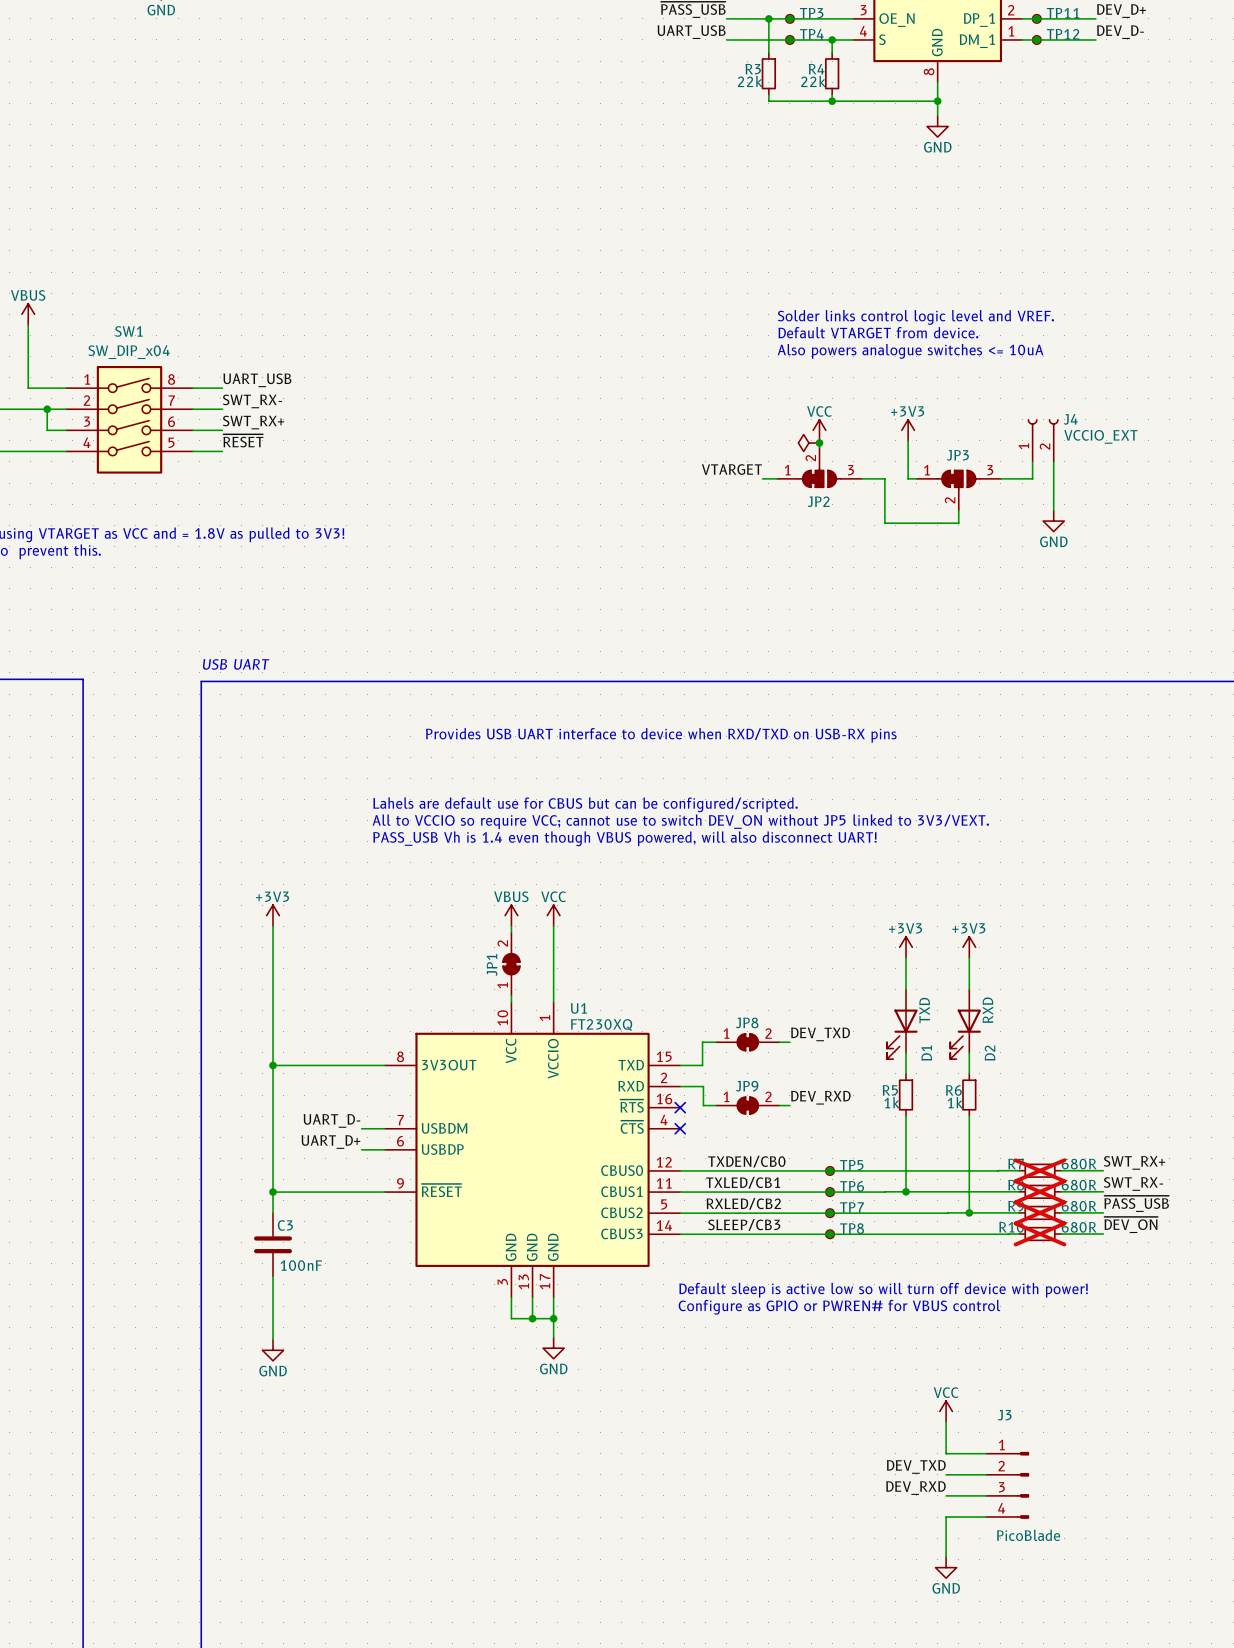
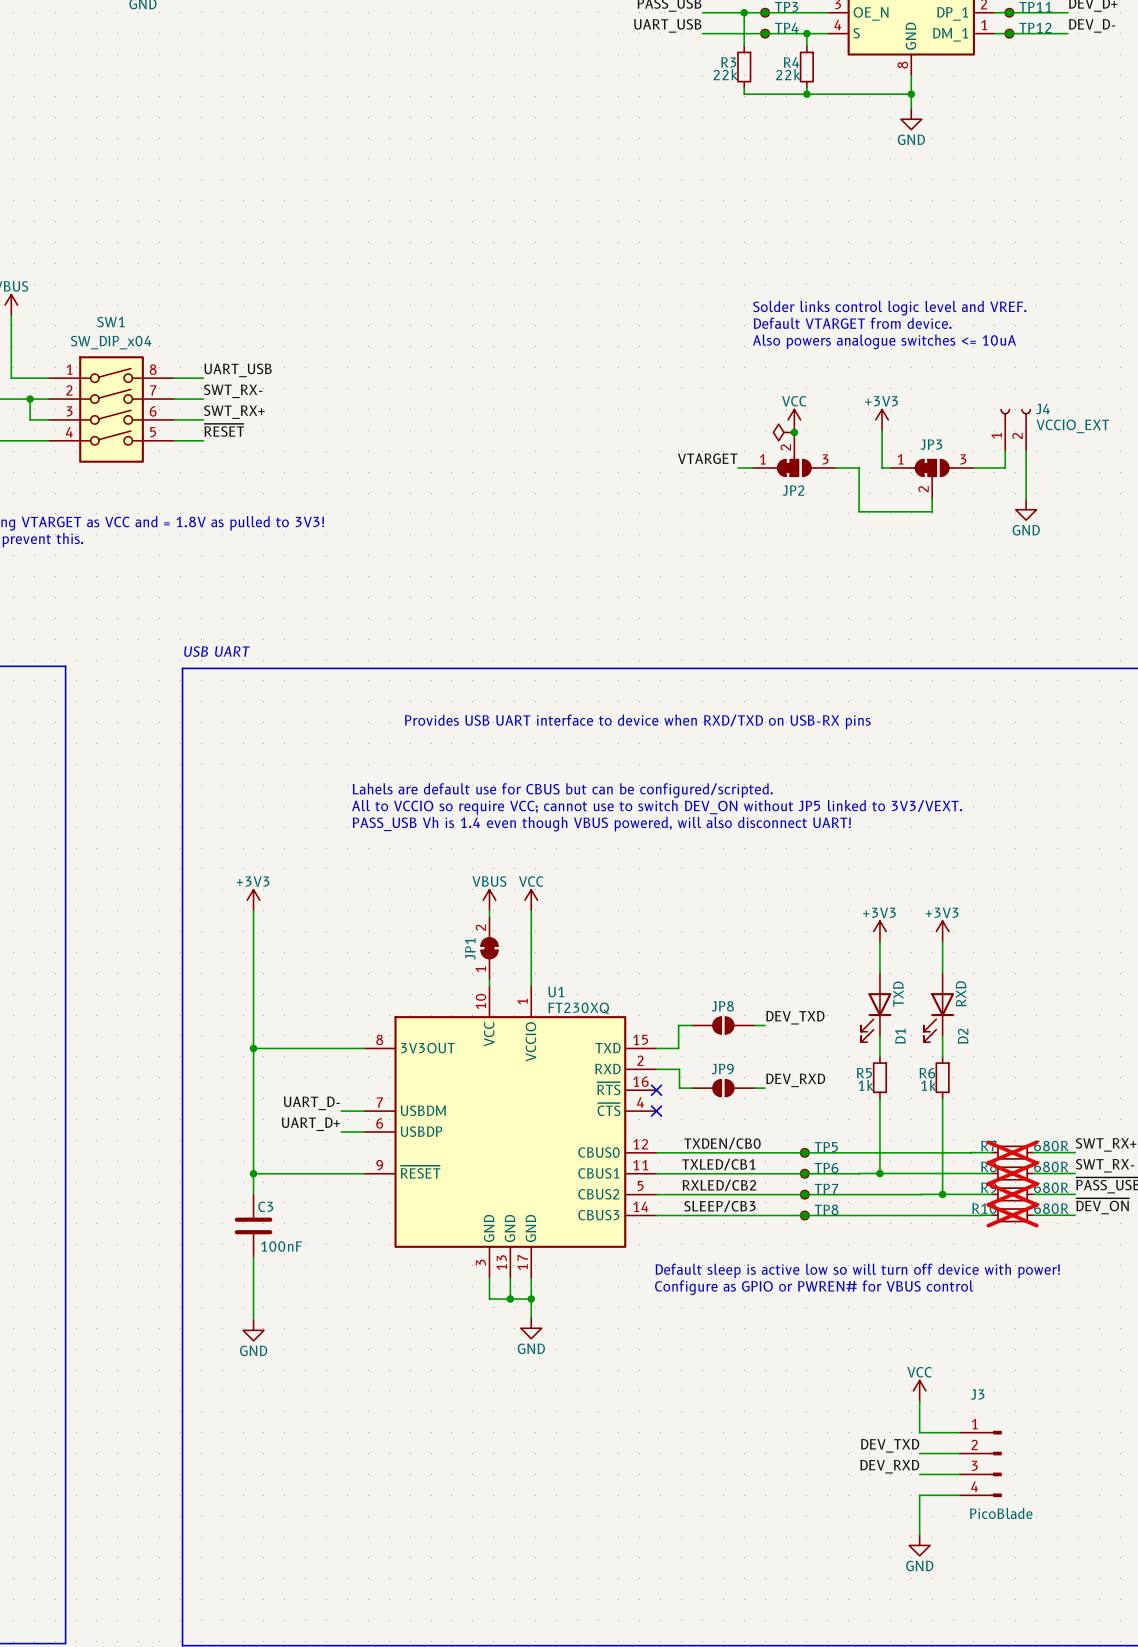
JP8 symbol: [716, 1033, 780, 1051] -> [692, 1017, 755, 1034]
JP9 symbol: [716, 1097, 780, 1114] -> [692, 1079, 755, 1097]

